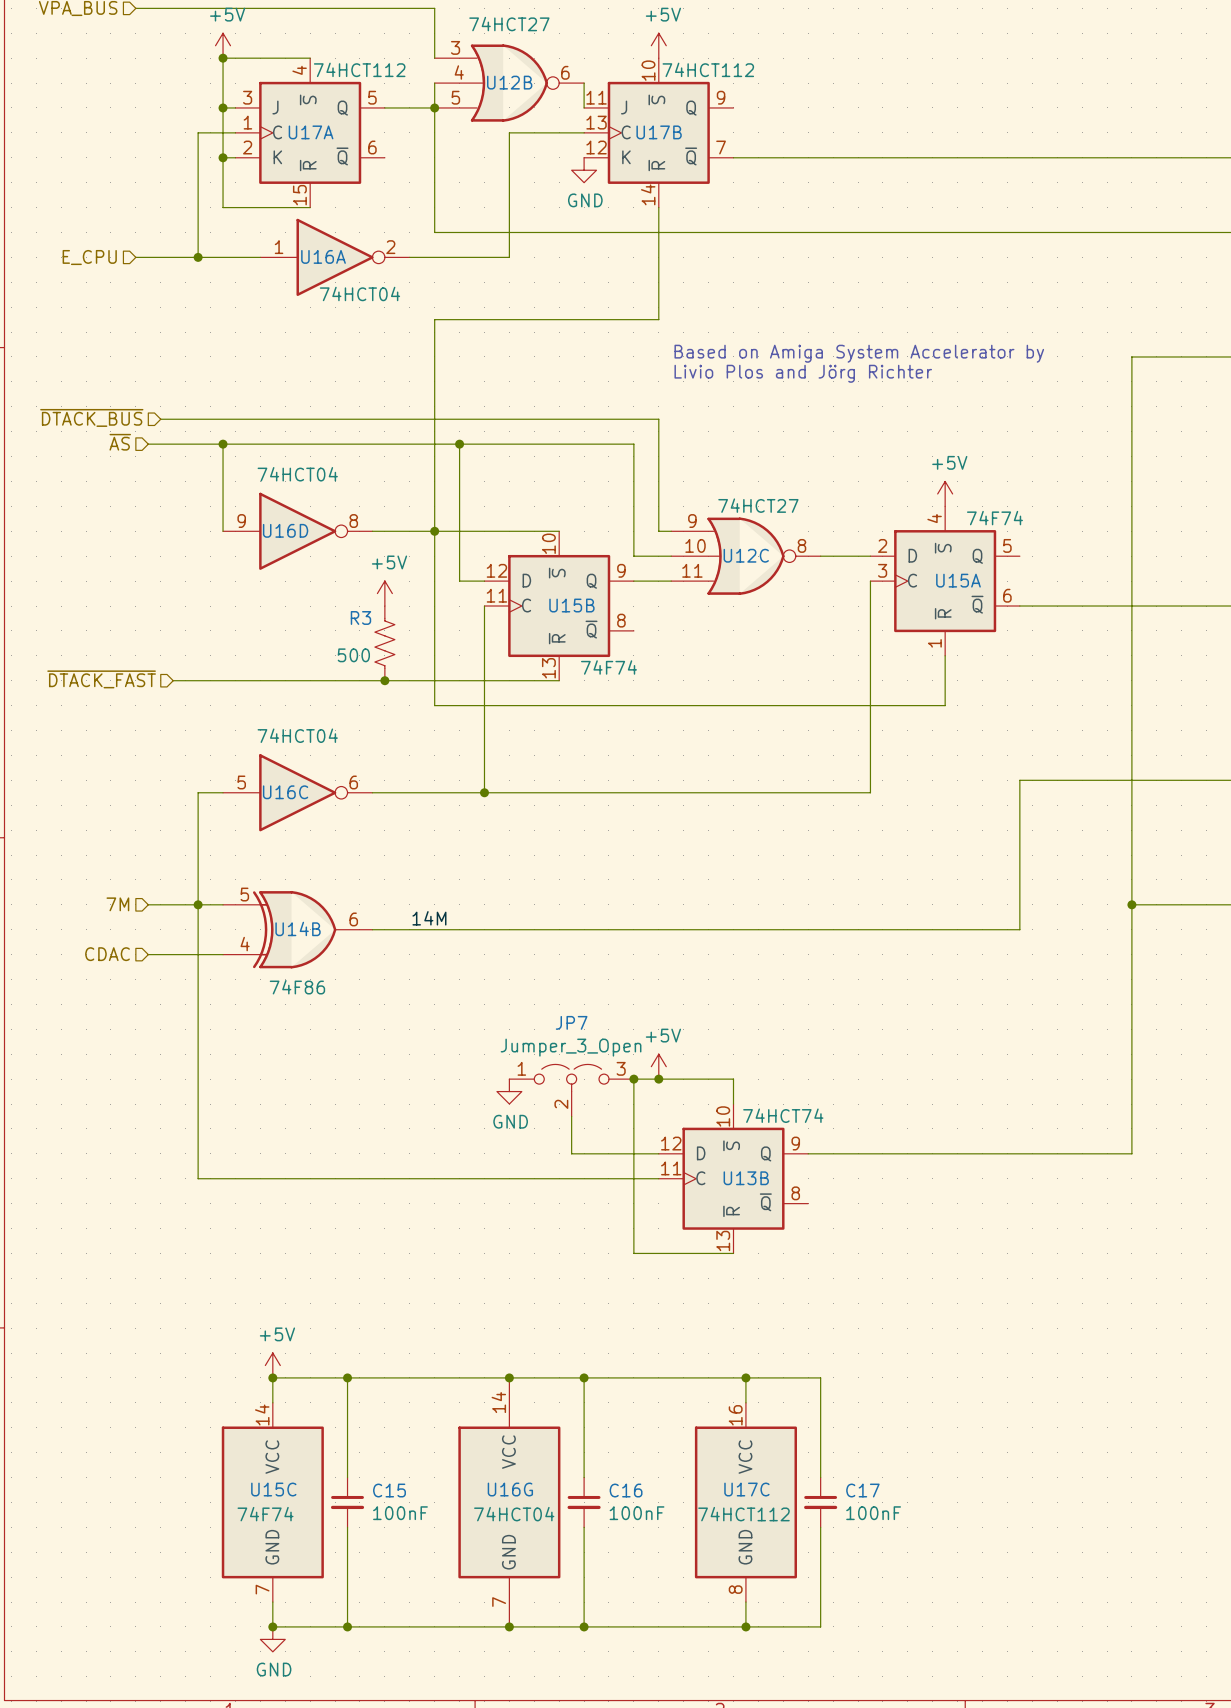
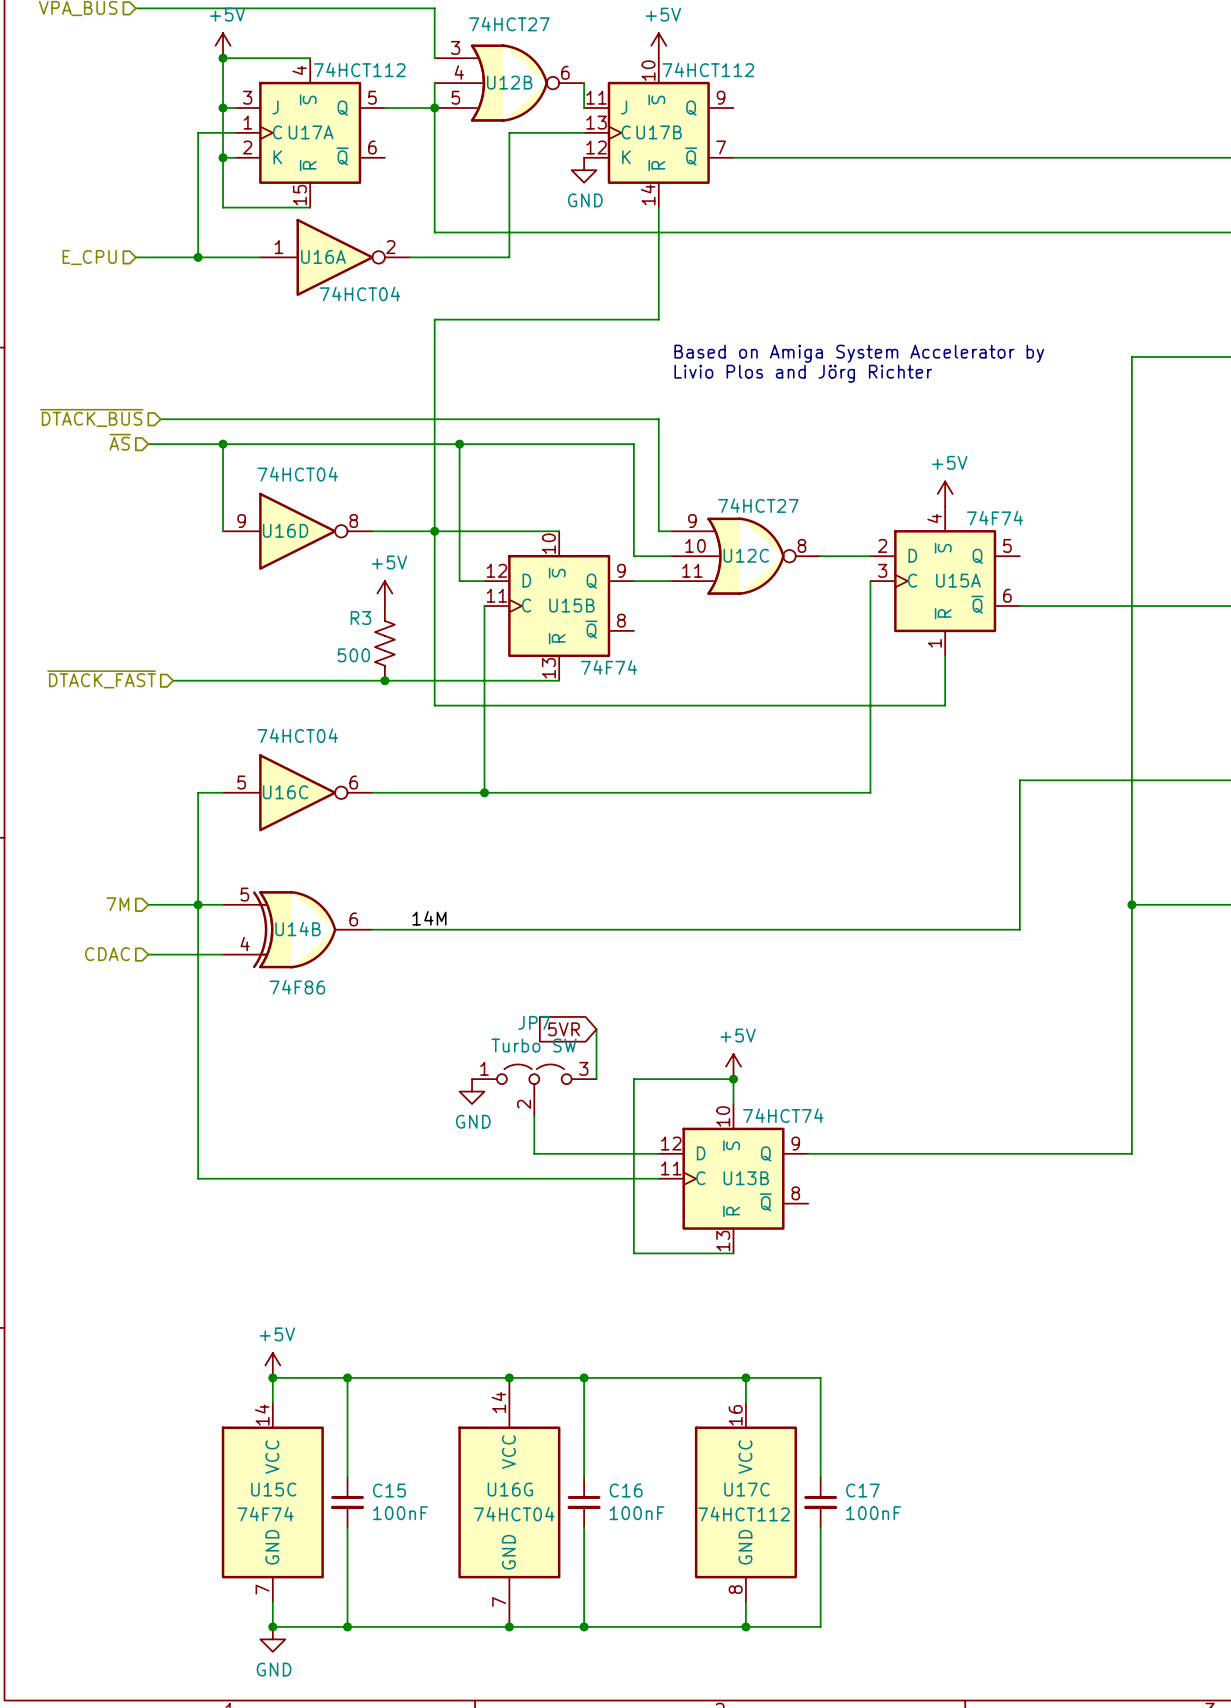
global label: none -> 5VR (564, 1029)
wire: none -> (596, 1029) (596, 1079)
JP7 value: Jumper_3_Open (571, 1047) -> Turbo SW (533, 1045)
power symbol position: +5V (658, 1066) -> +5V (733, 1066)
junction: (633, 1079) -> none
junction: (658, 1079) -> none
junction: none -> (733, 1079)
JP7 position: (571, 1090) -> (534, 1090)
power symbol position: GND (509, 1091) -> GND (472, 1091)
wire: (571, 1116) (571, 1153) -> (534, 1116) (534, 1153) (571, 1153)

